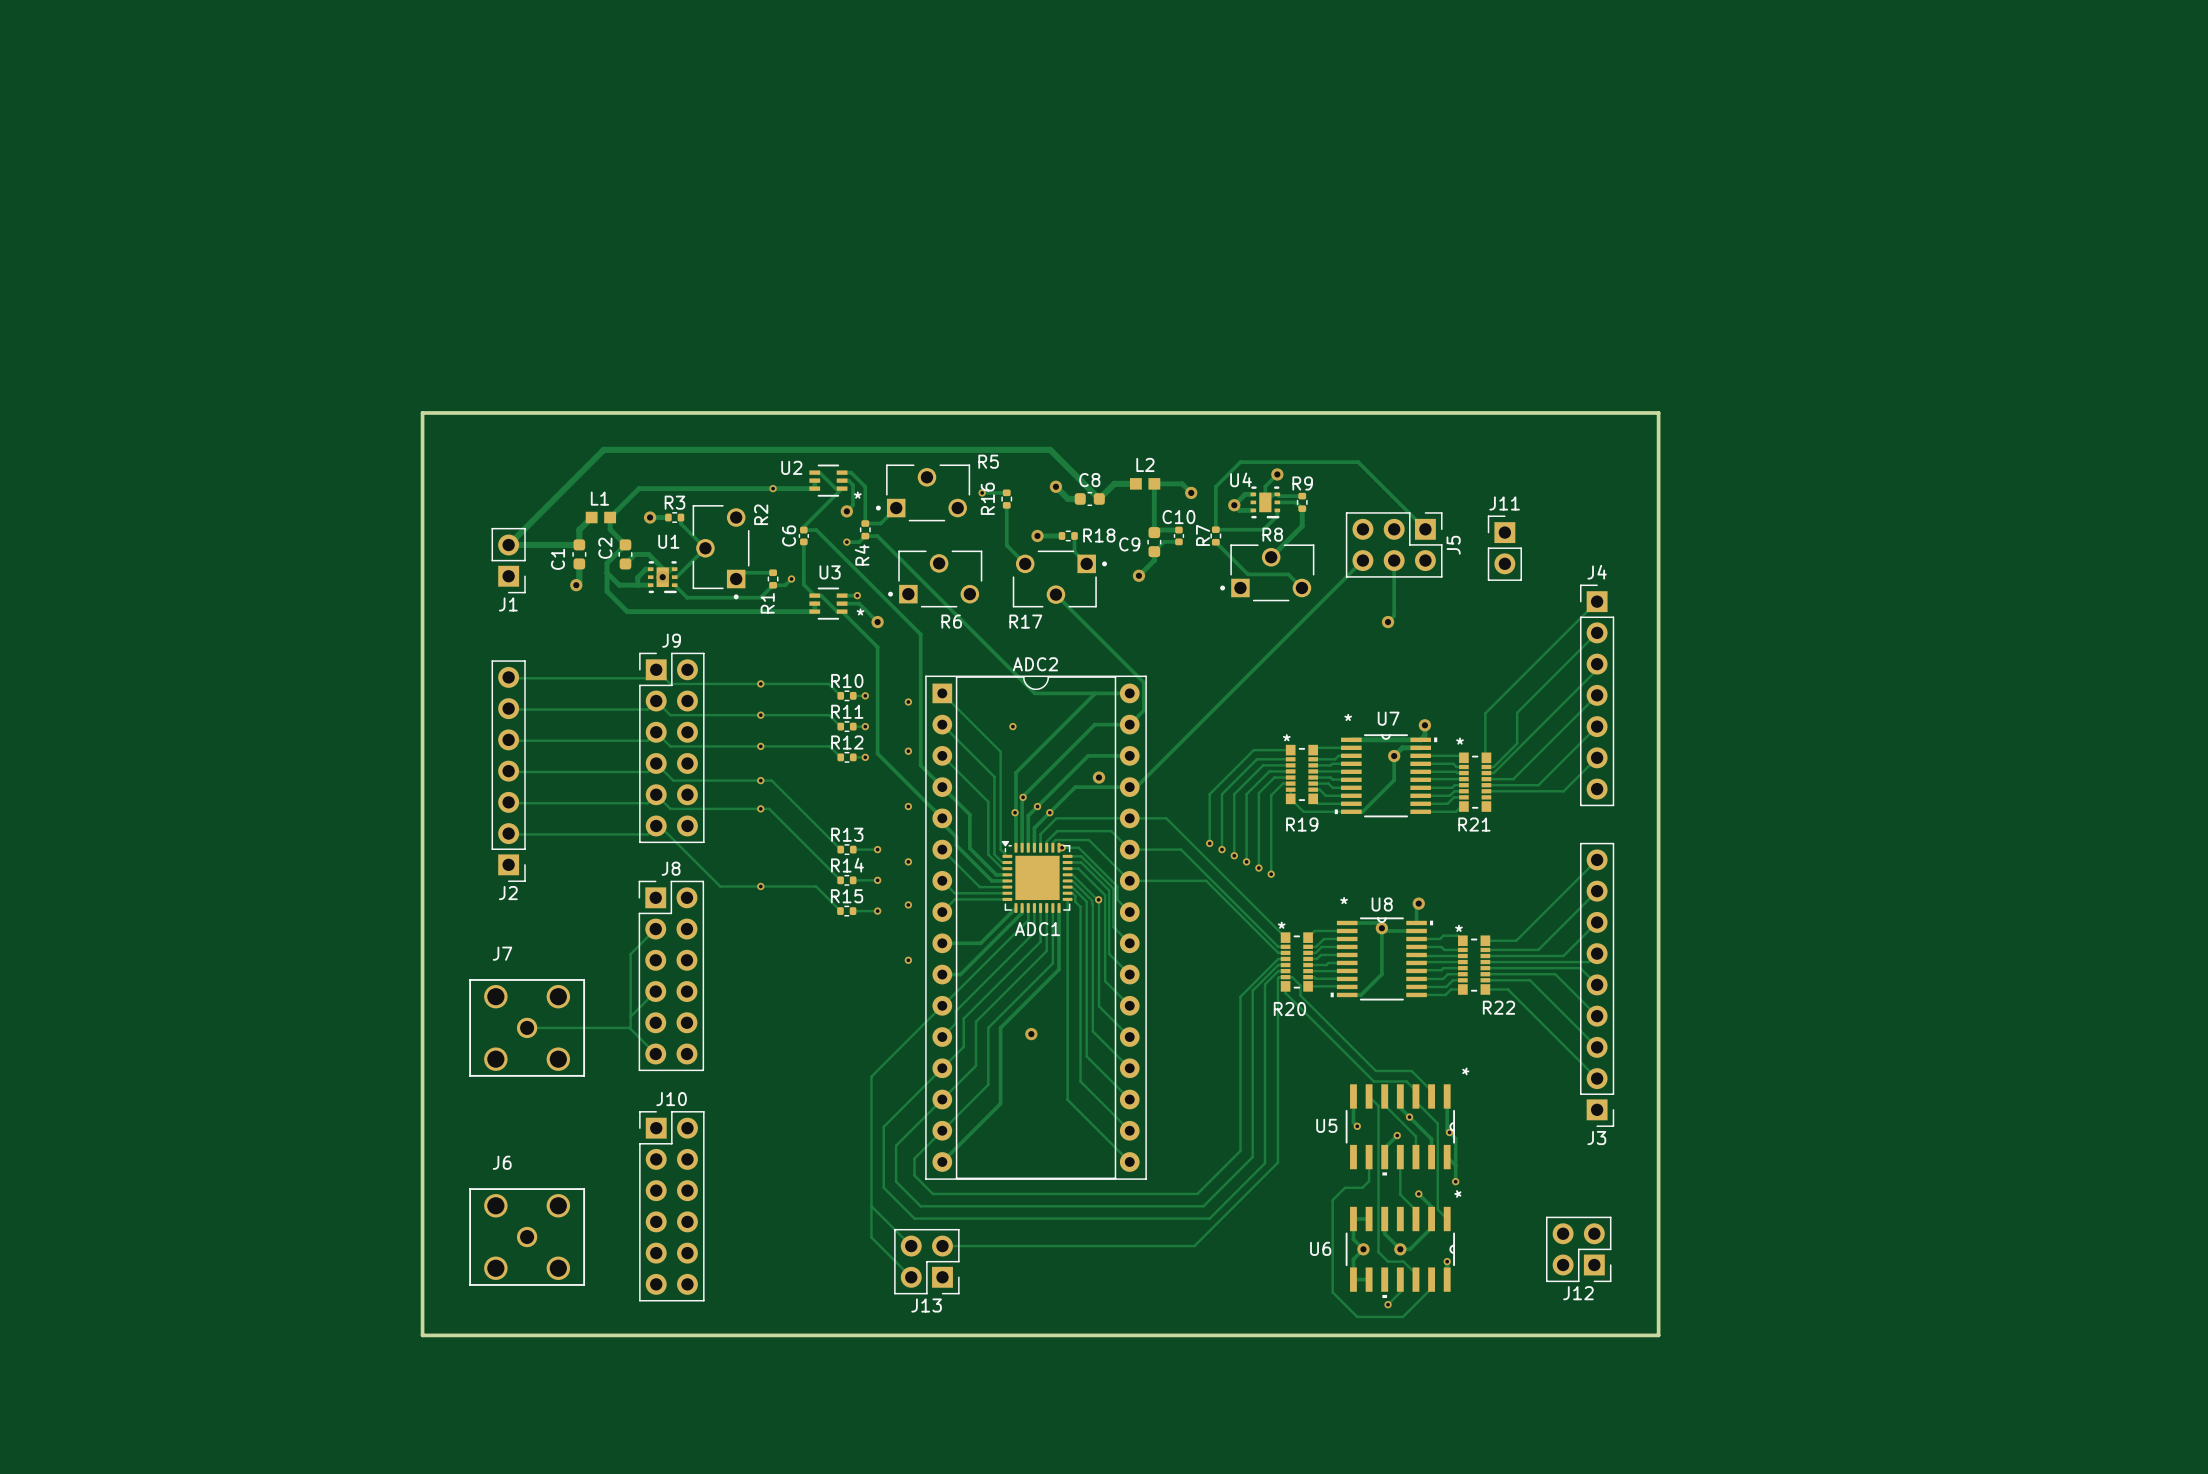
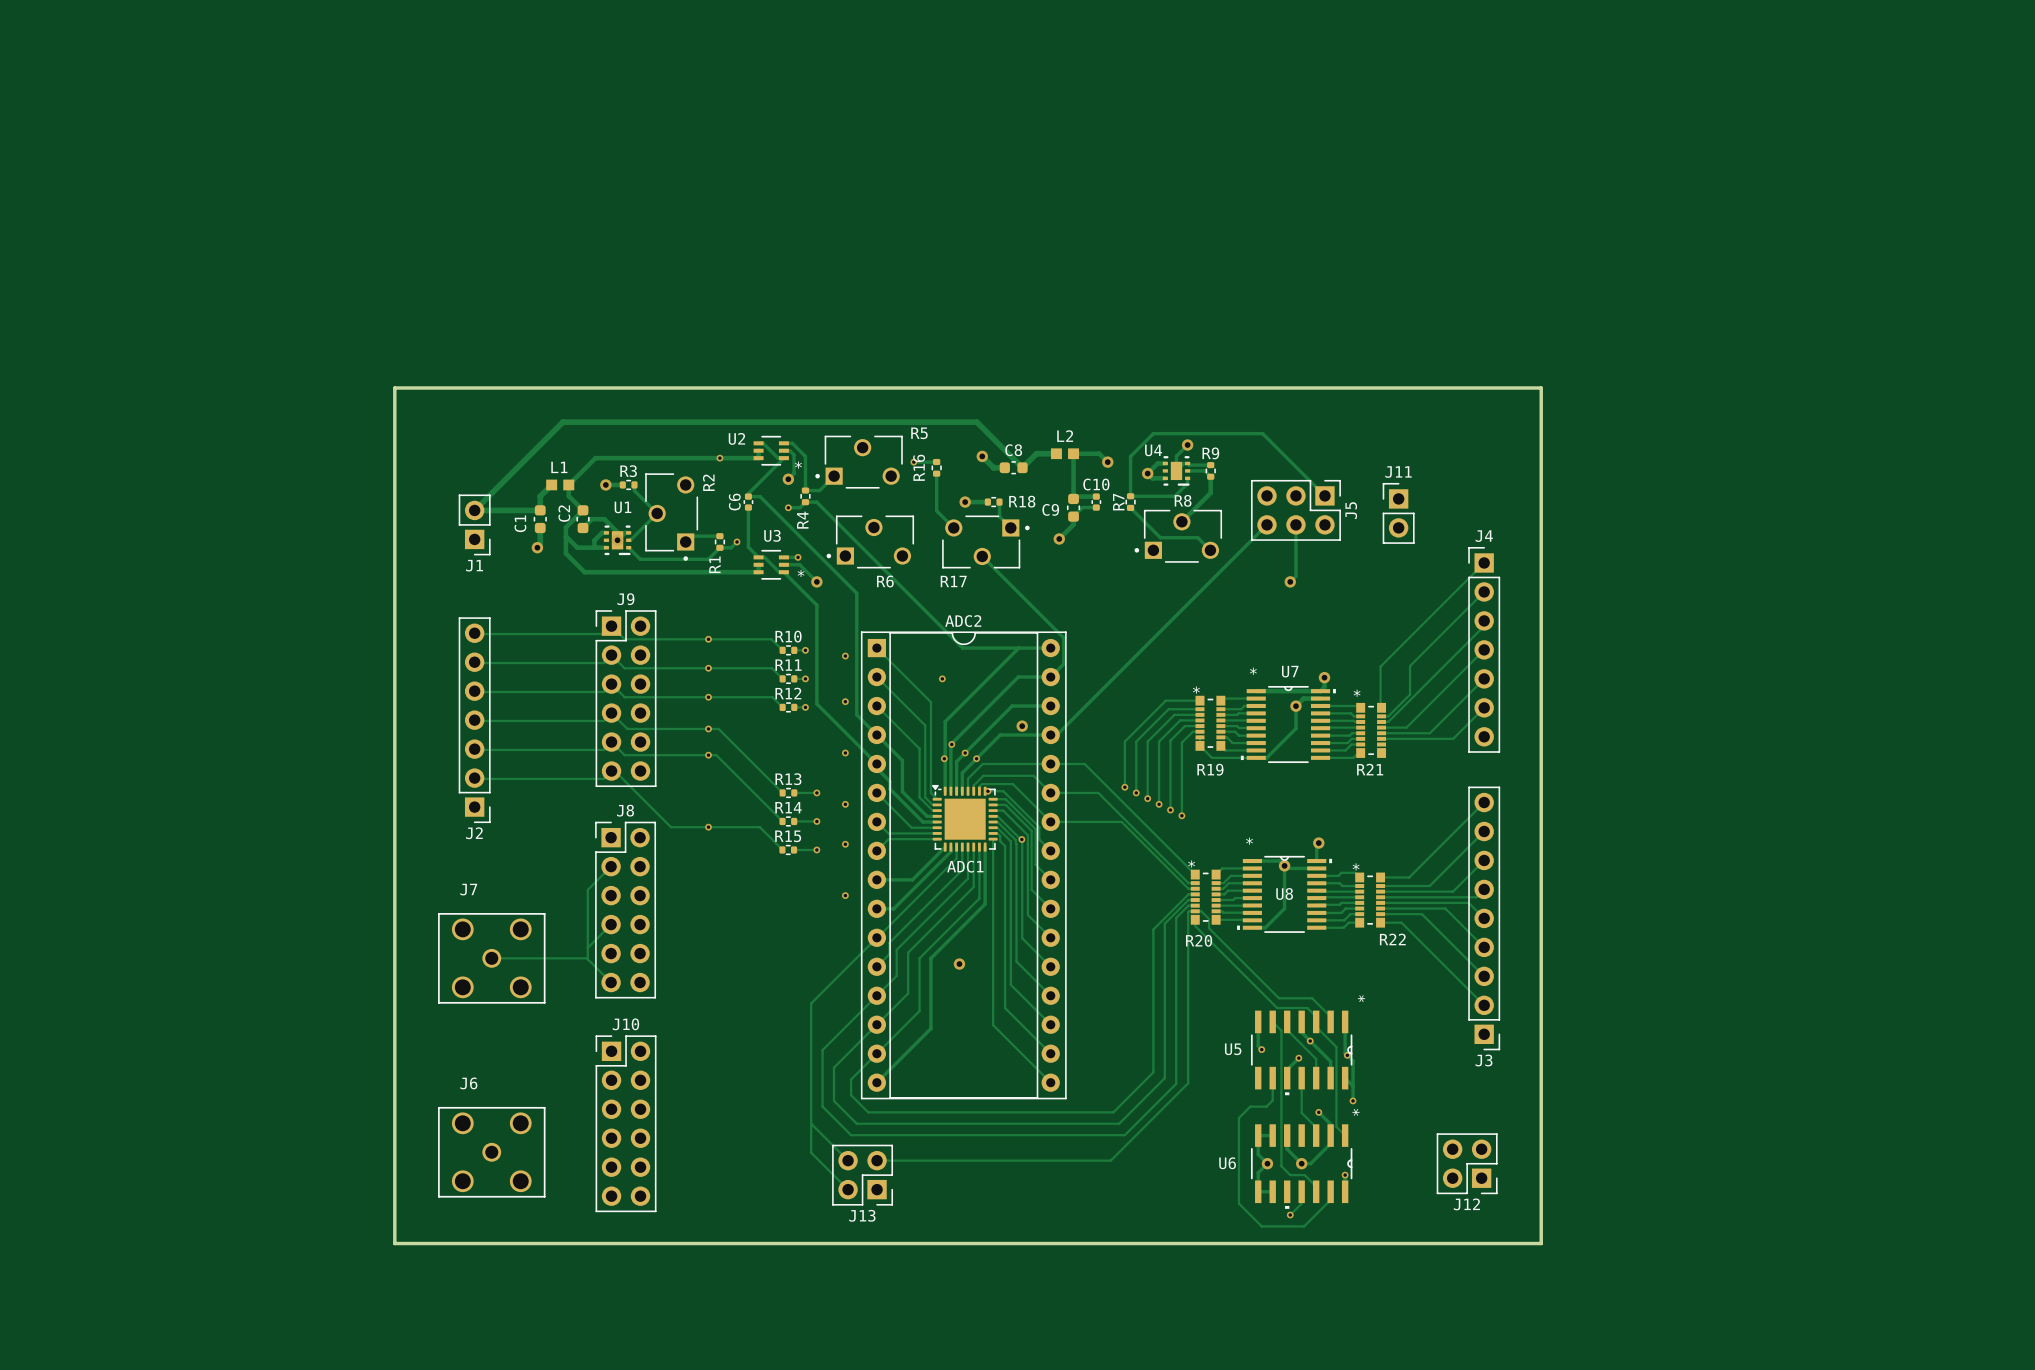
U8 name position: U8 (1382, 904) -> U8 (1284, 893)

